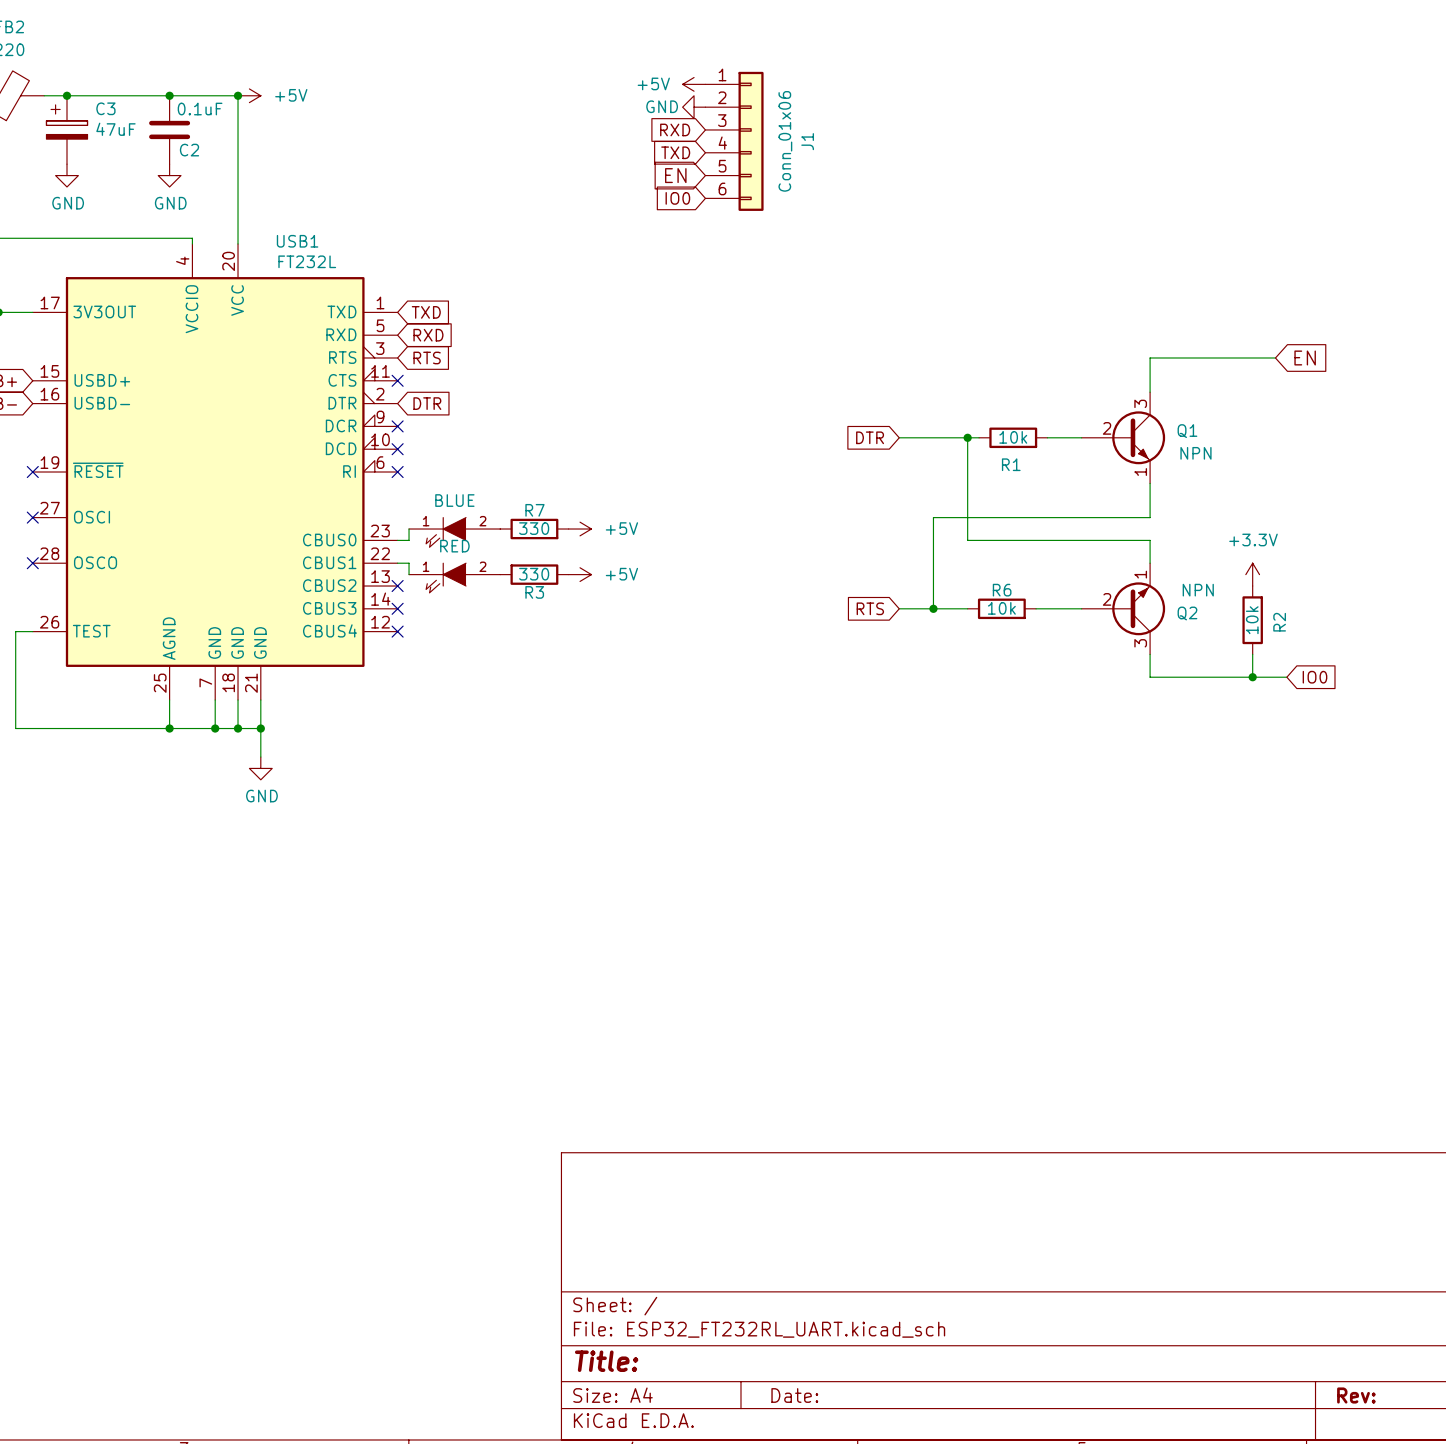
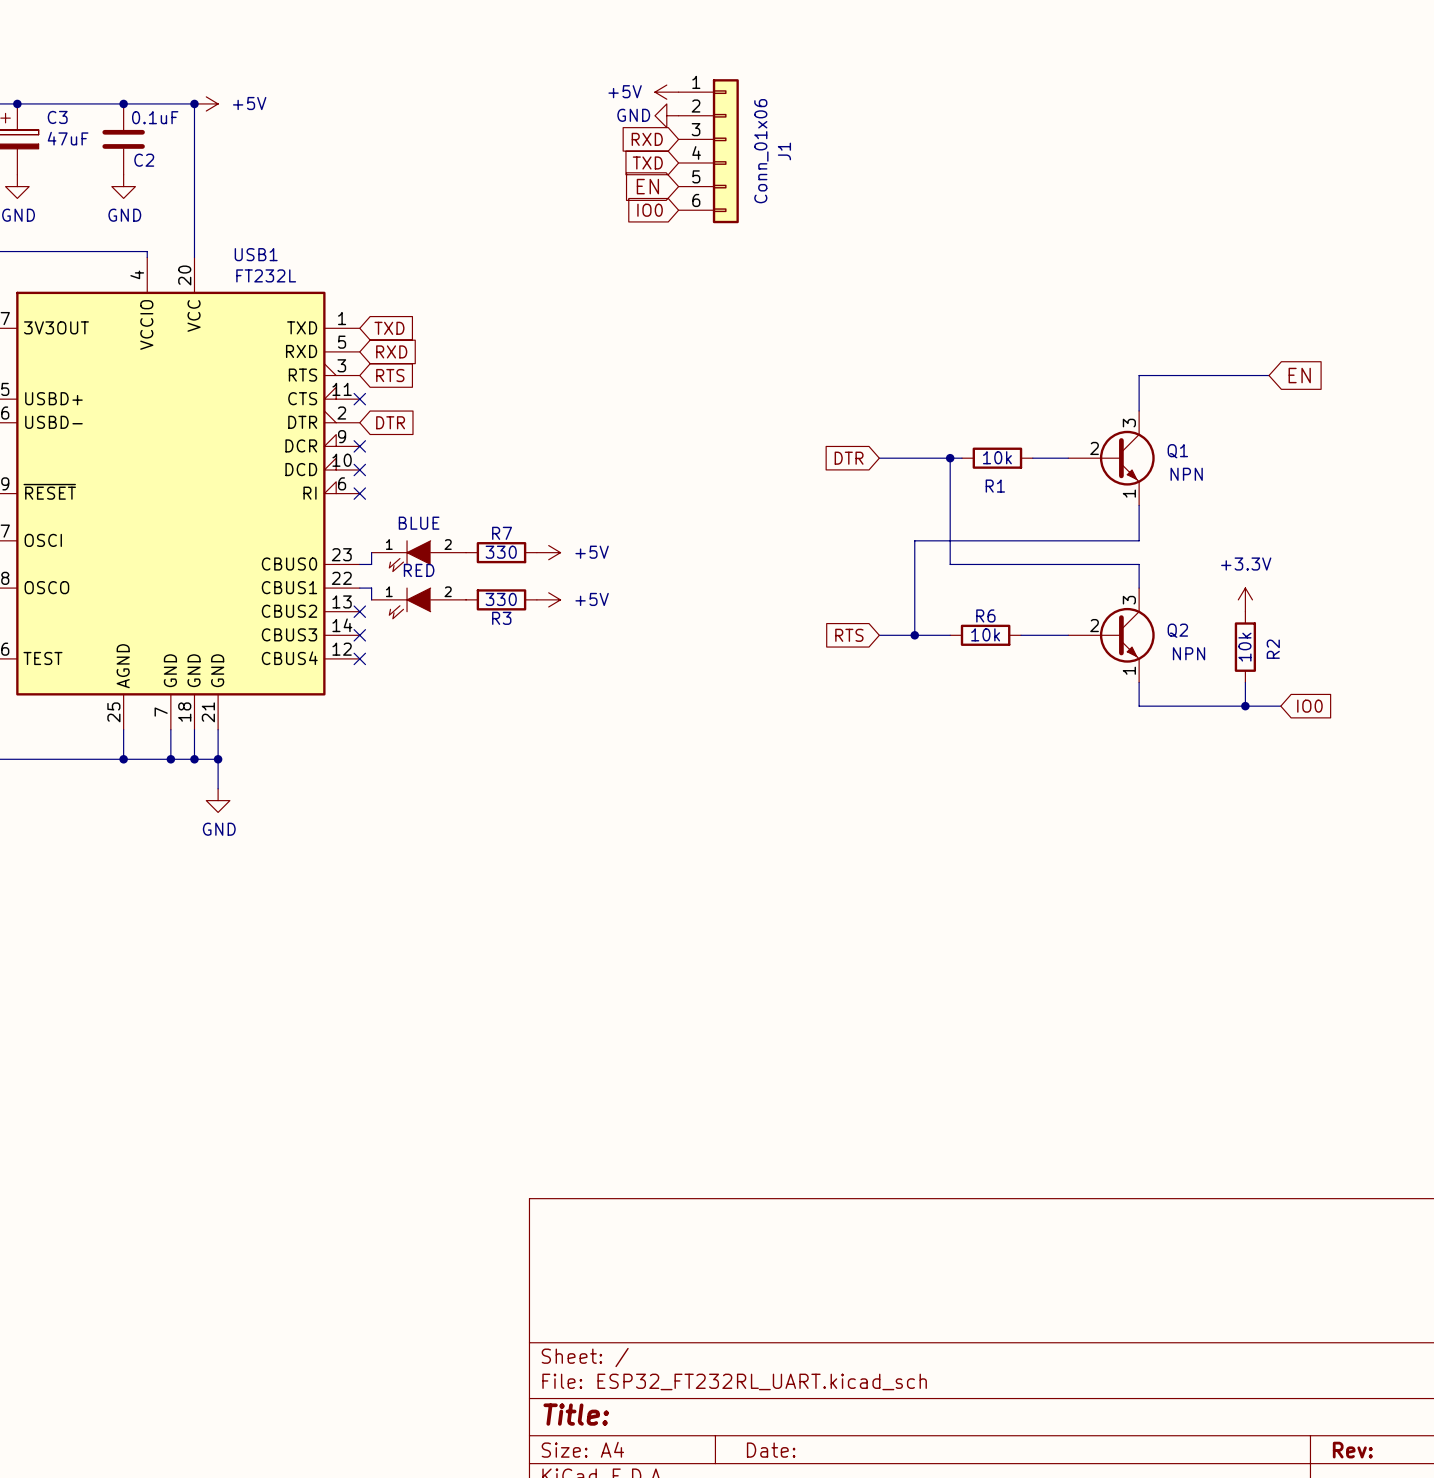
Q2 flip: as is (1138, 608) -> up-down (1127, 635)

